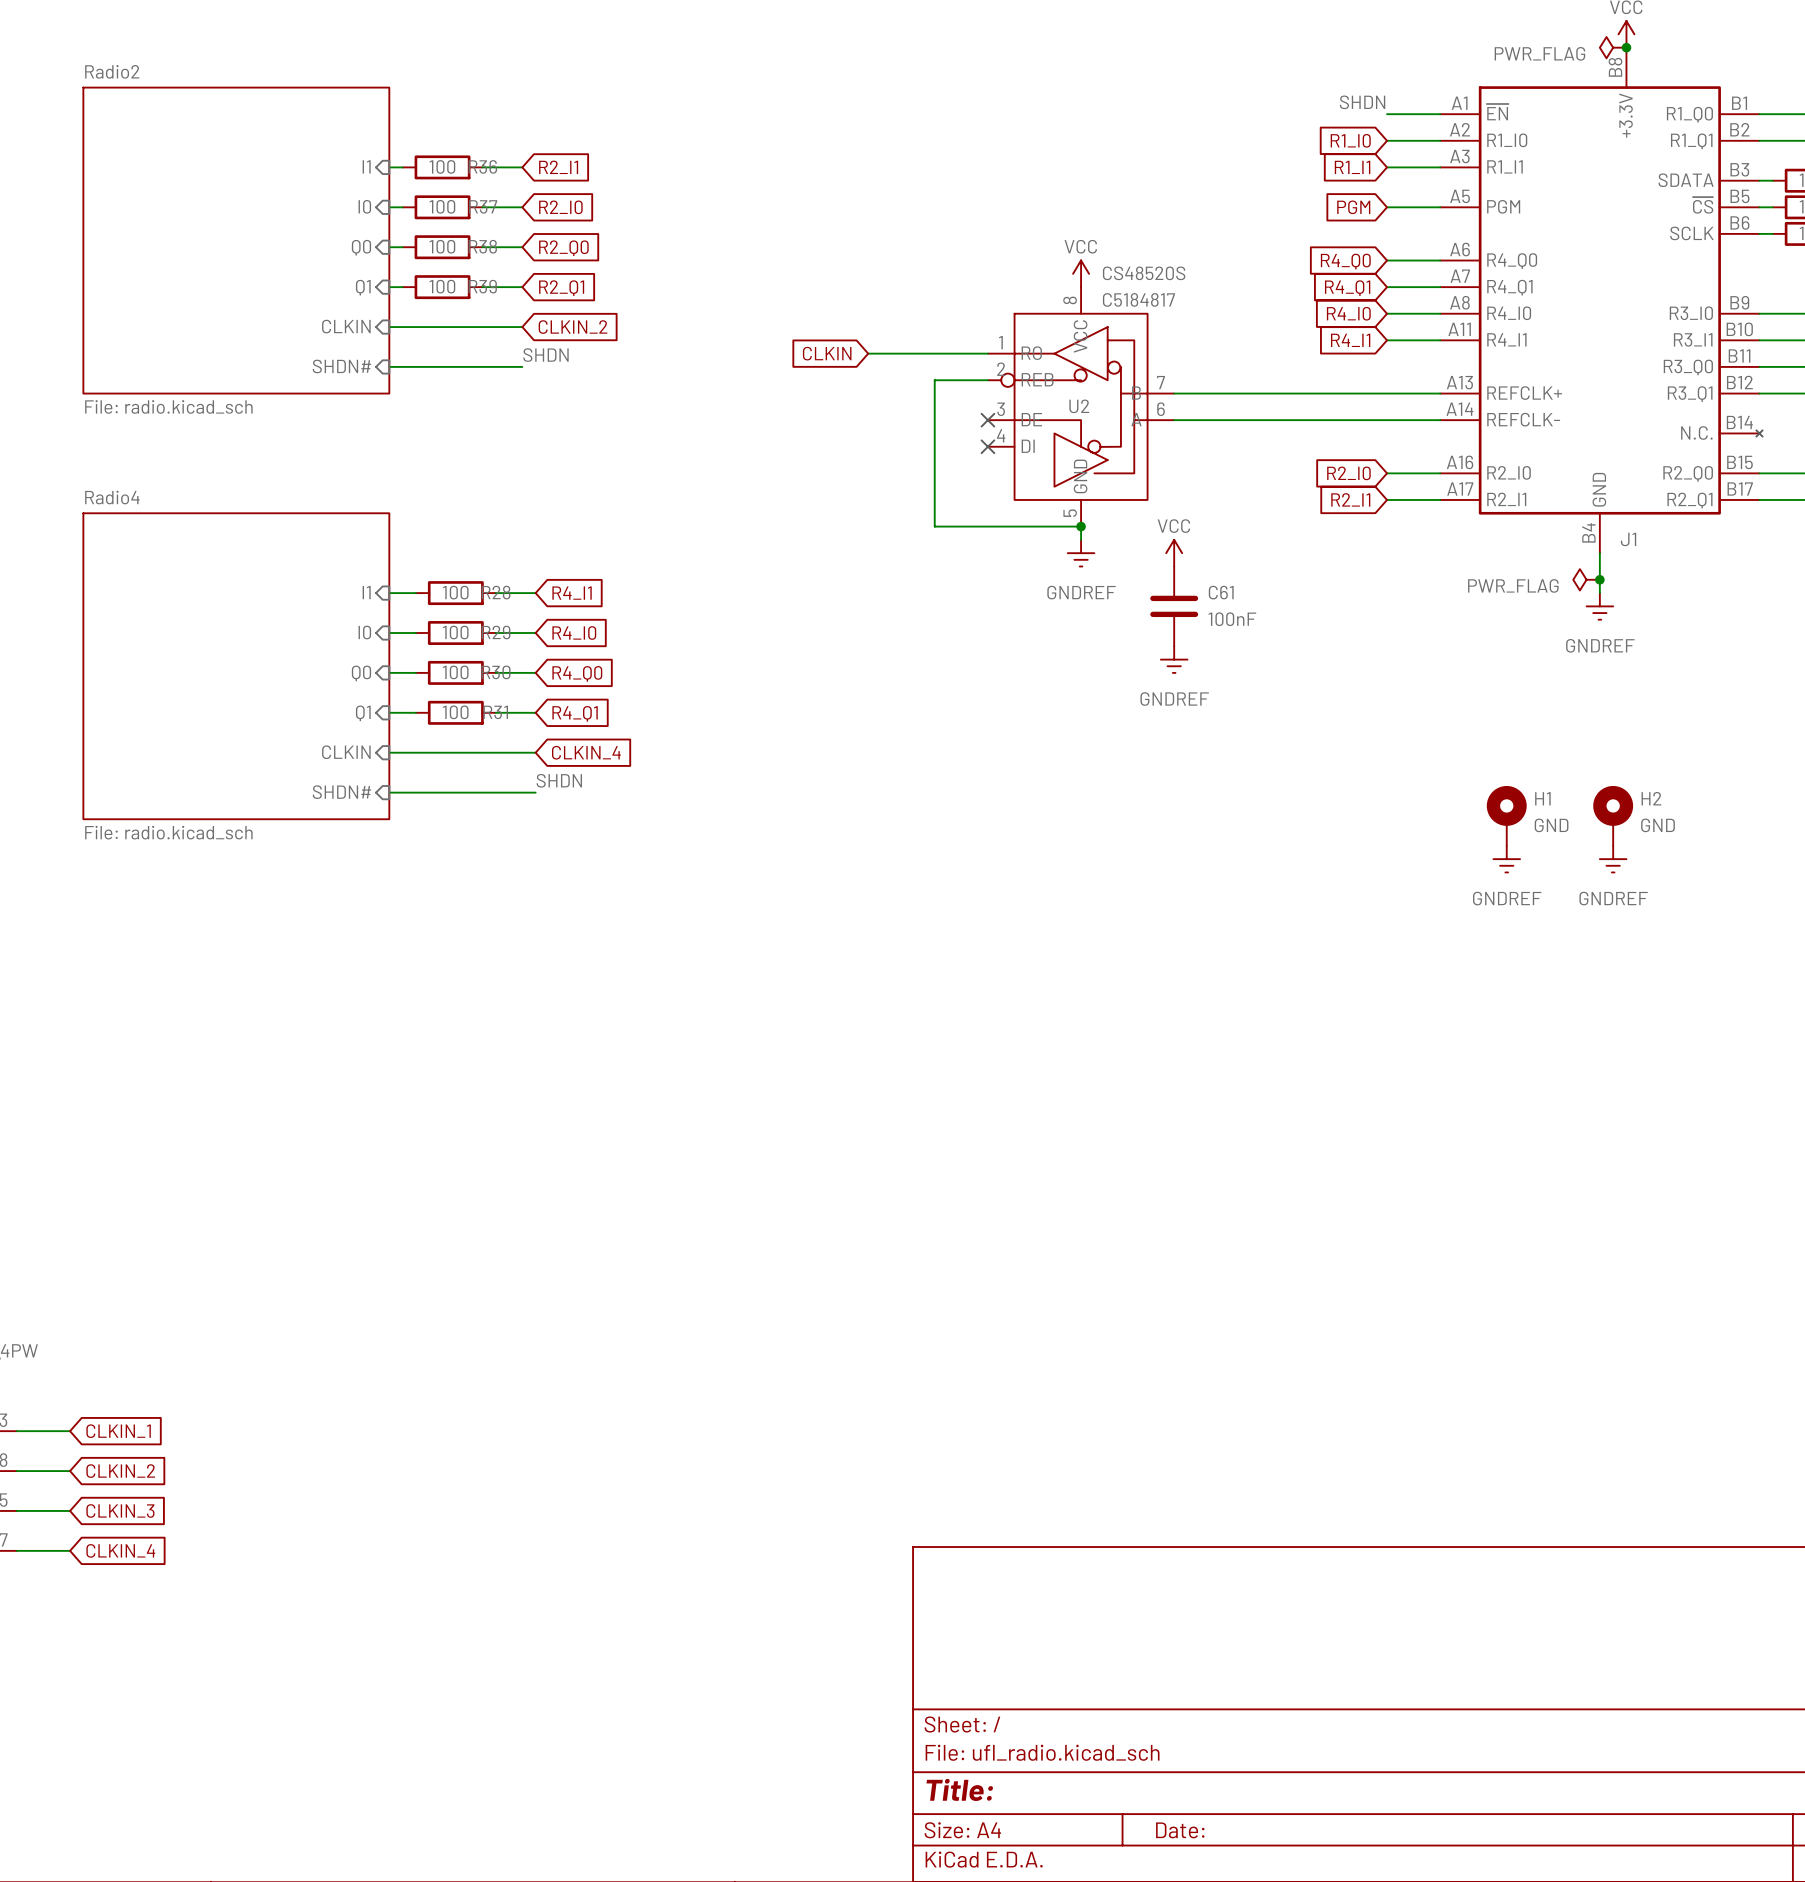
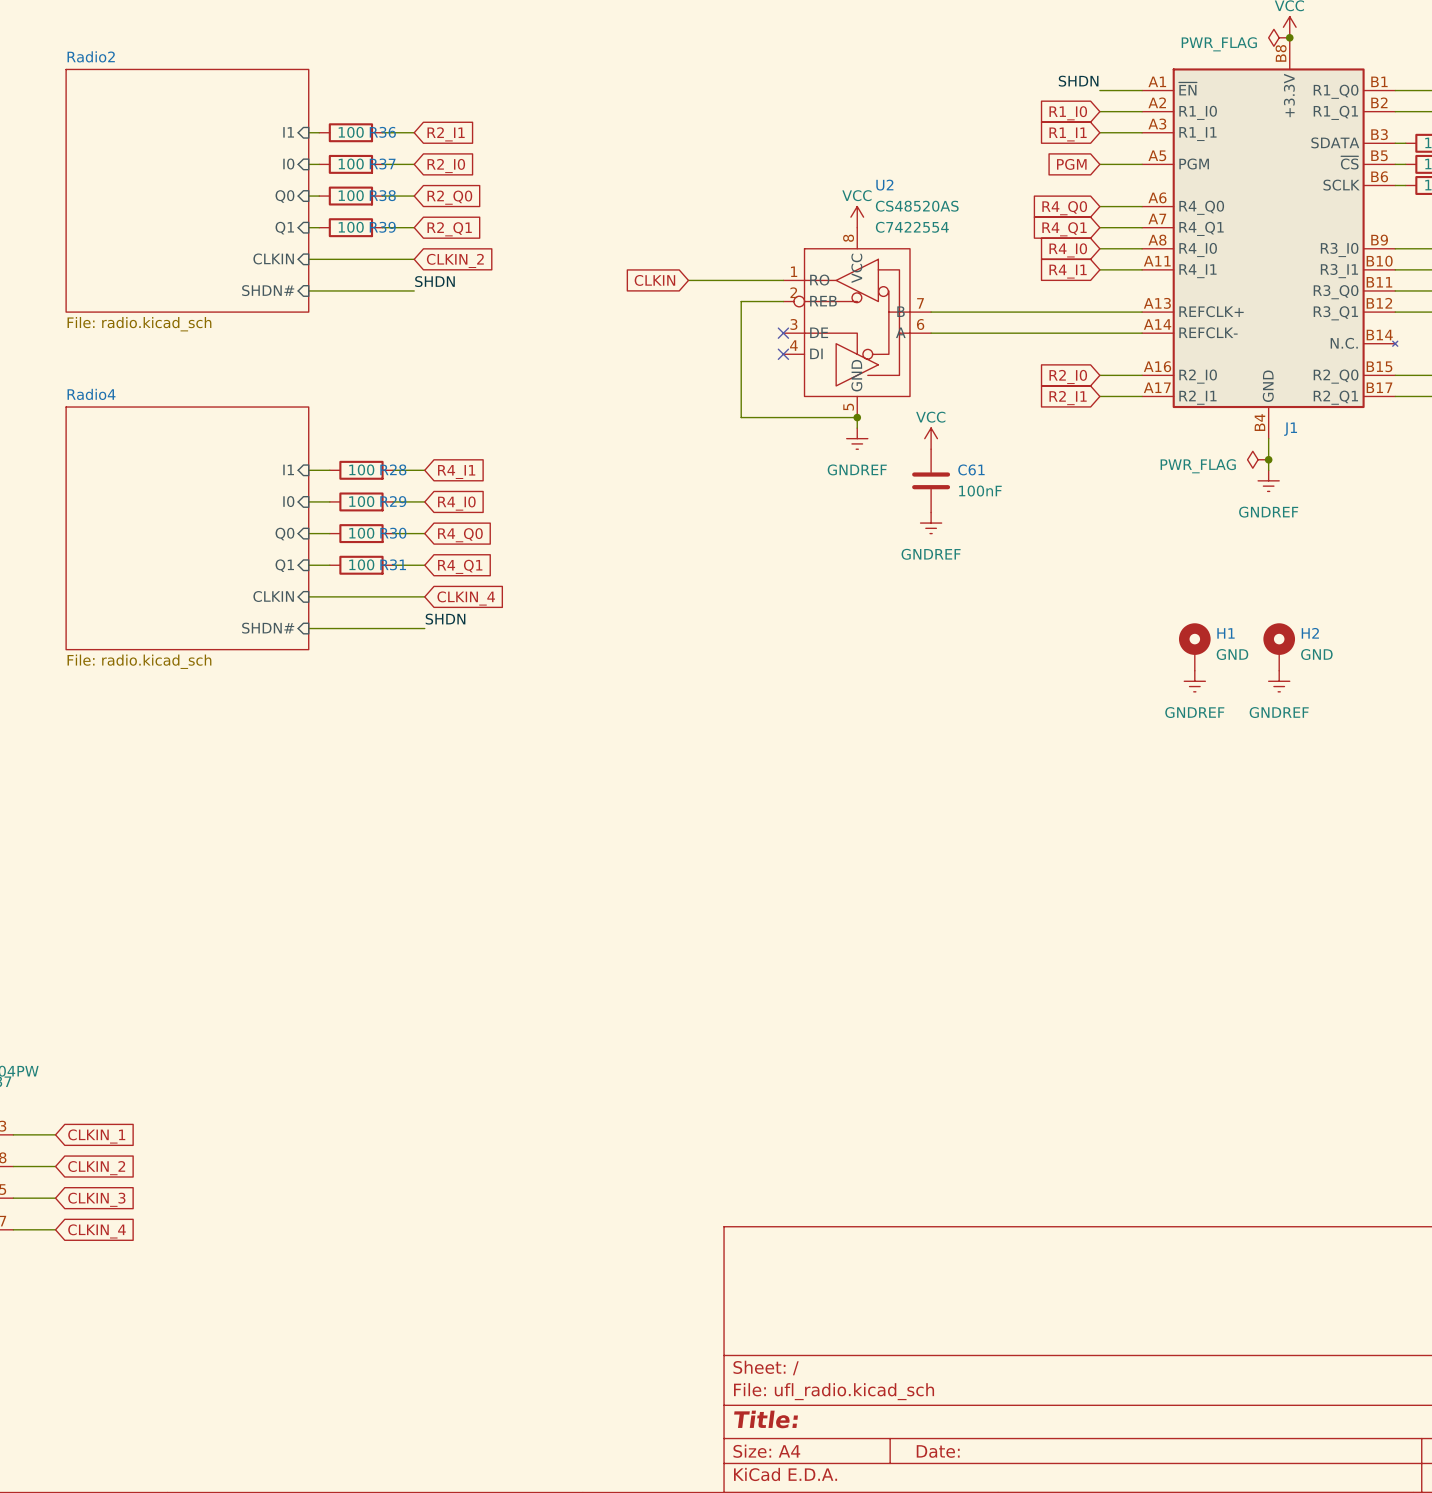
U2 value: CS48520S (1144, 273) -> CS48520AS (917, 206)
U2 text: C5184817 (1138, 299) -> C7422554 (912, 227)
U2 name position: U2 (1079, 406) -> U2 (884, 185)

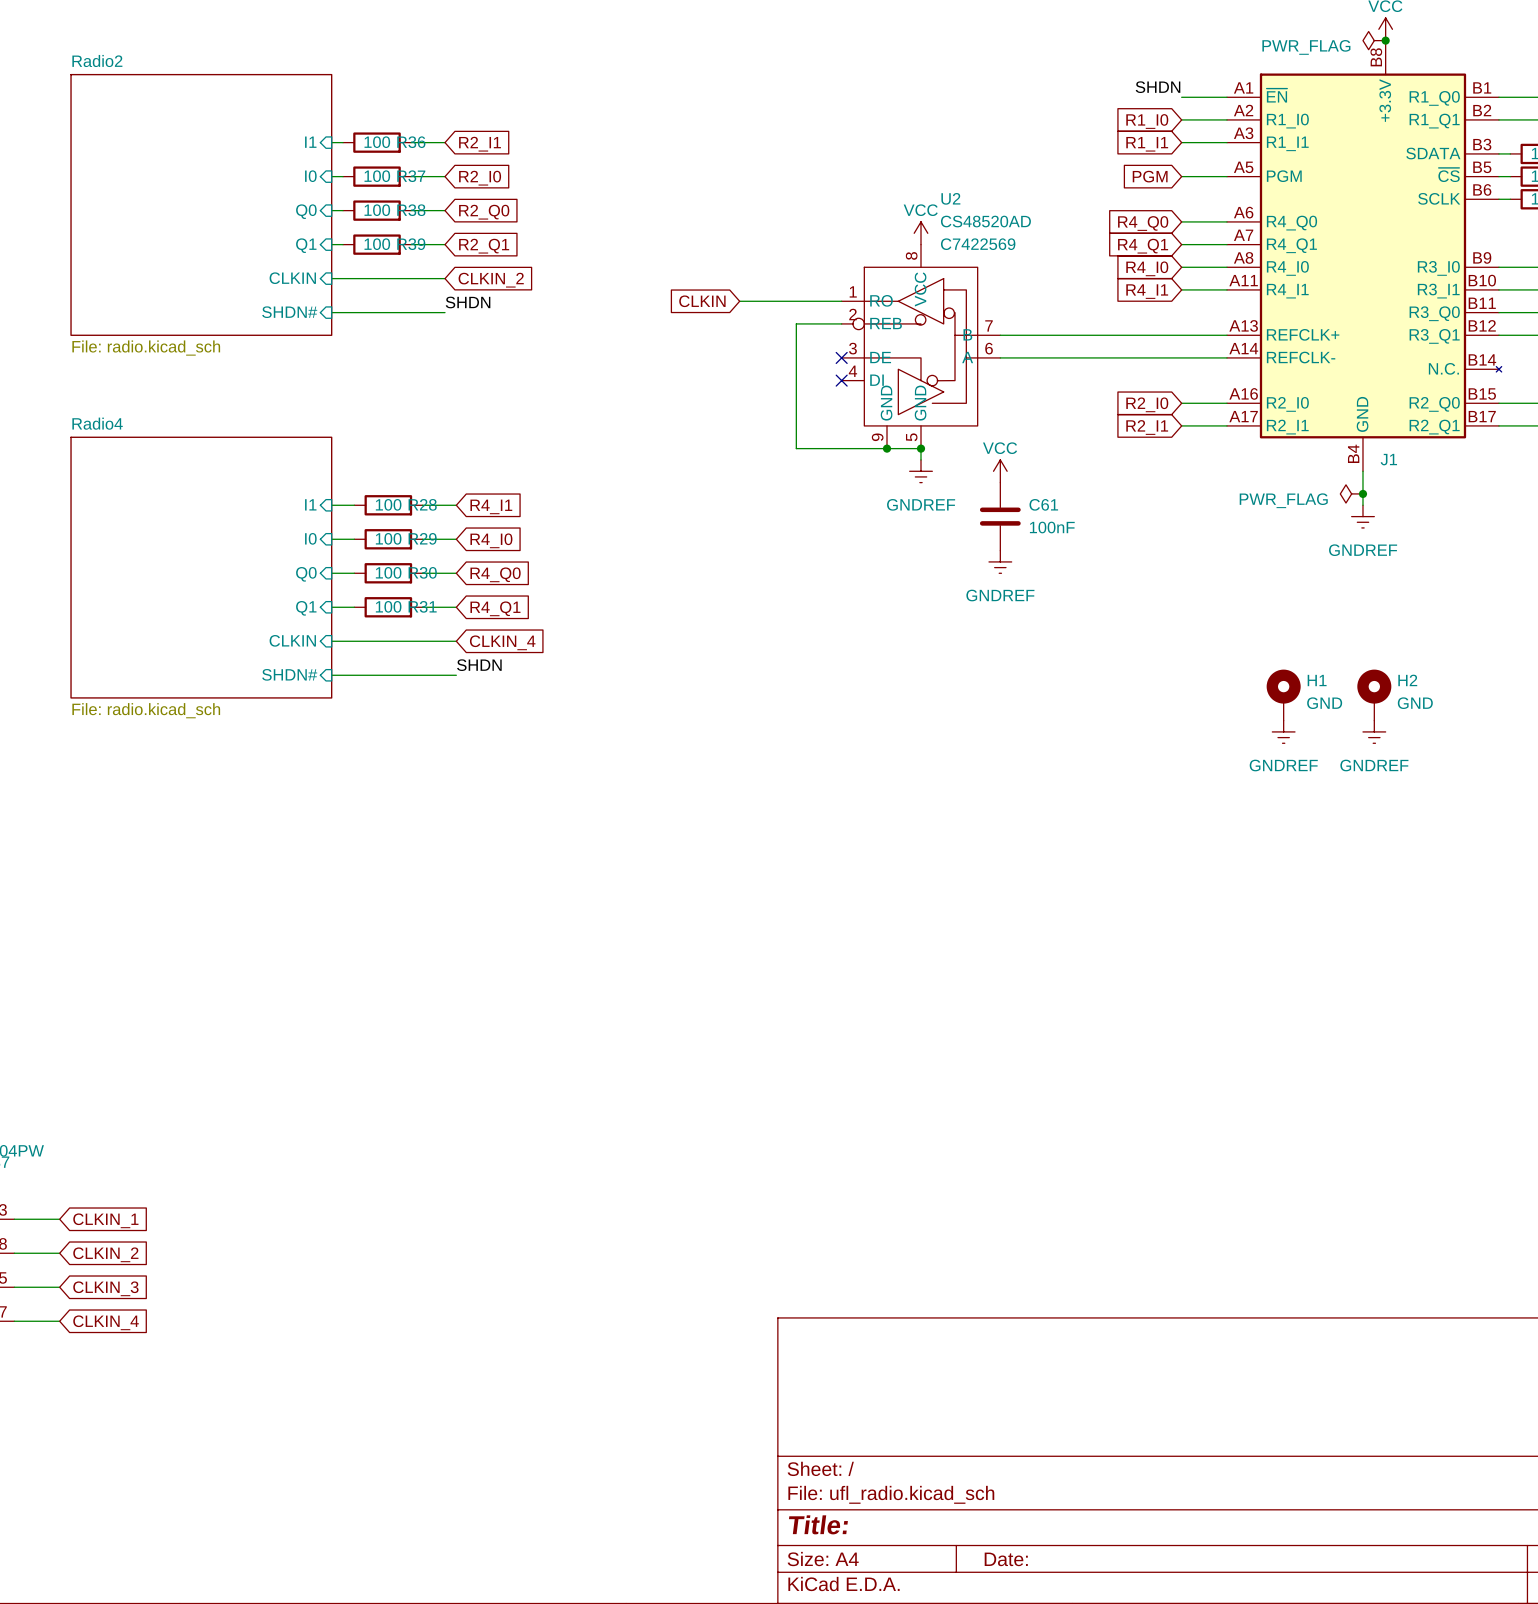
U2 value: CS48520AS (917, 206) -> CS48520AD (985, 221)
U2 symbol: [783, 227, 932, 418] -> [841, 244, 1001, 449]
U2 text: C7422554 (912, 227) -> C7422569 (978, 244)
junction: none -> (887, 448)

